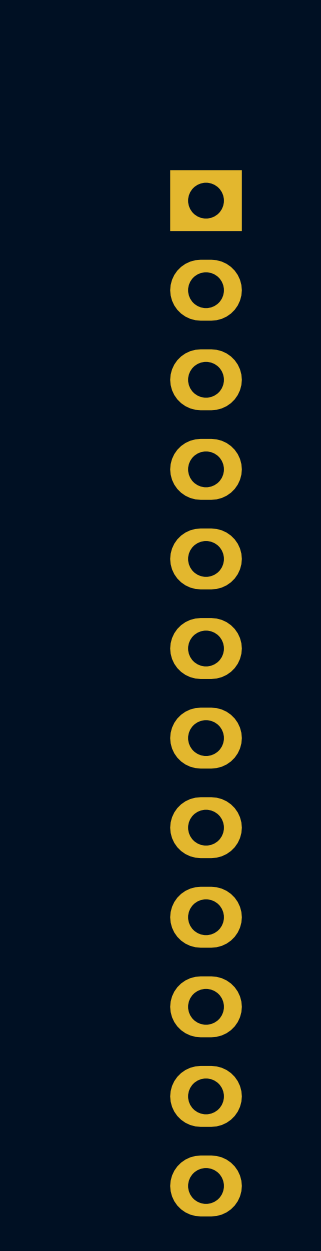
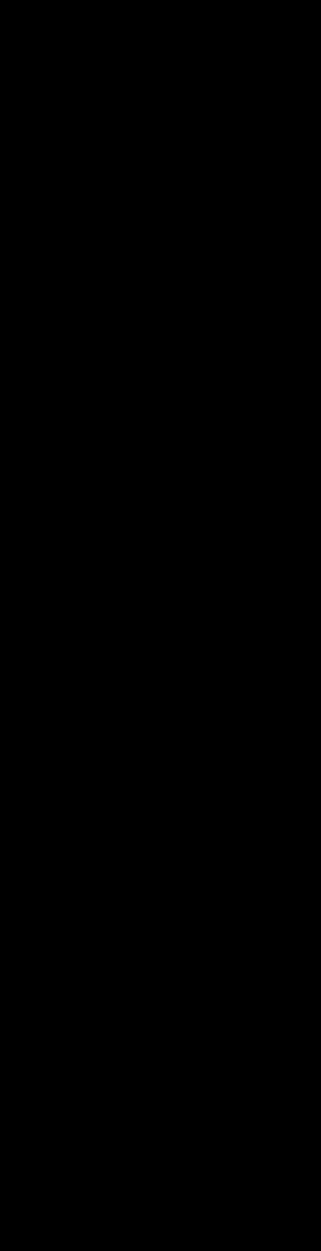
part: (206, 693) -> none

